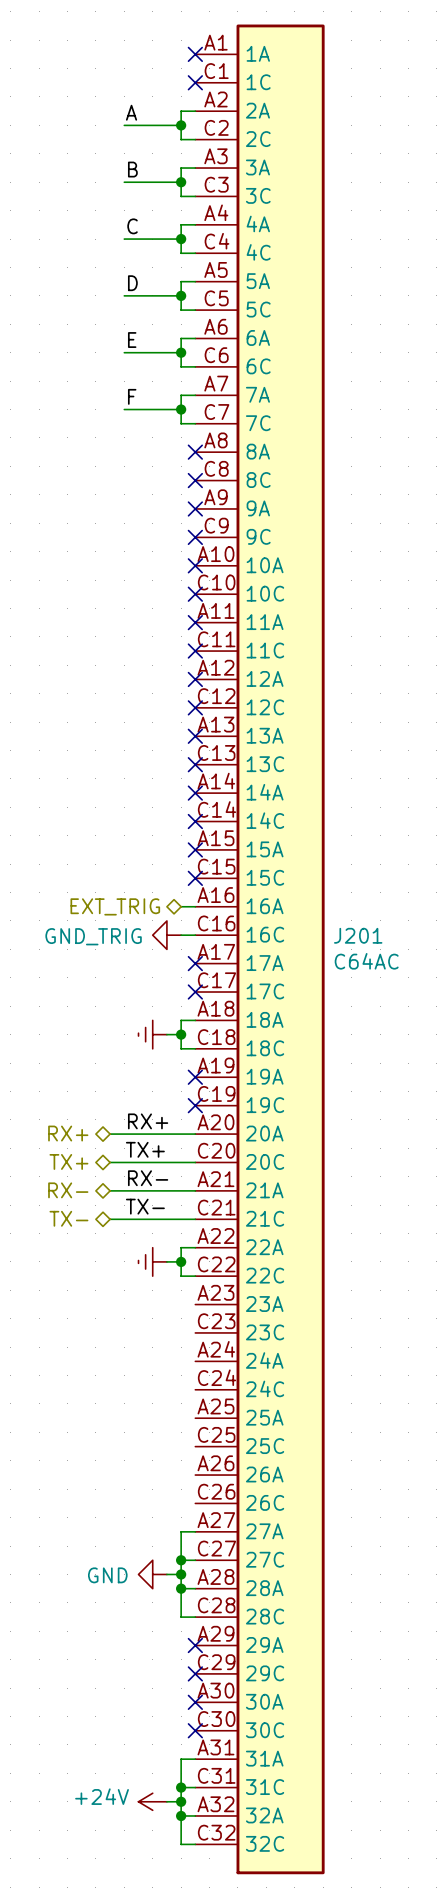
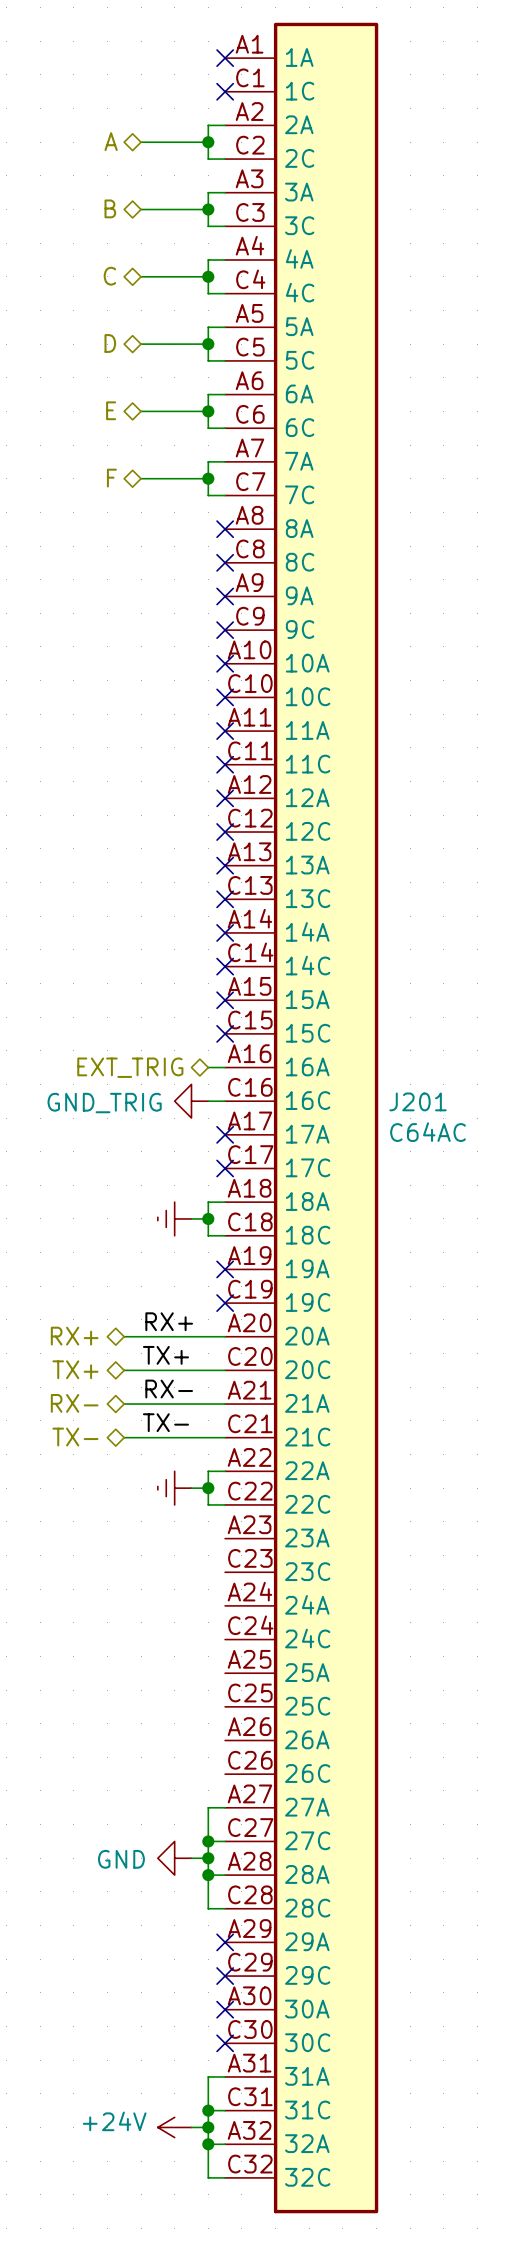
label: A (131, 112) -> none
hierarchical label: none -> A (111, 141)
label: B (132, 169) -> none
hierarchical label: none -> B (110, 208)
label: C (132, 226) -> none
hierarchical label: none -> C (109, 276)
label: D (132, 283) -> none
hierarchical label: none -> D (110, 343)
label: E (132, 340) -> none
hierarchical label: none -> E (111, 410)
label: F (132, 396) -> none
hierarchical label: none -> F (111, 478)

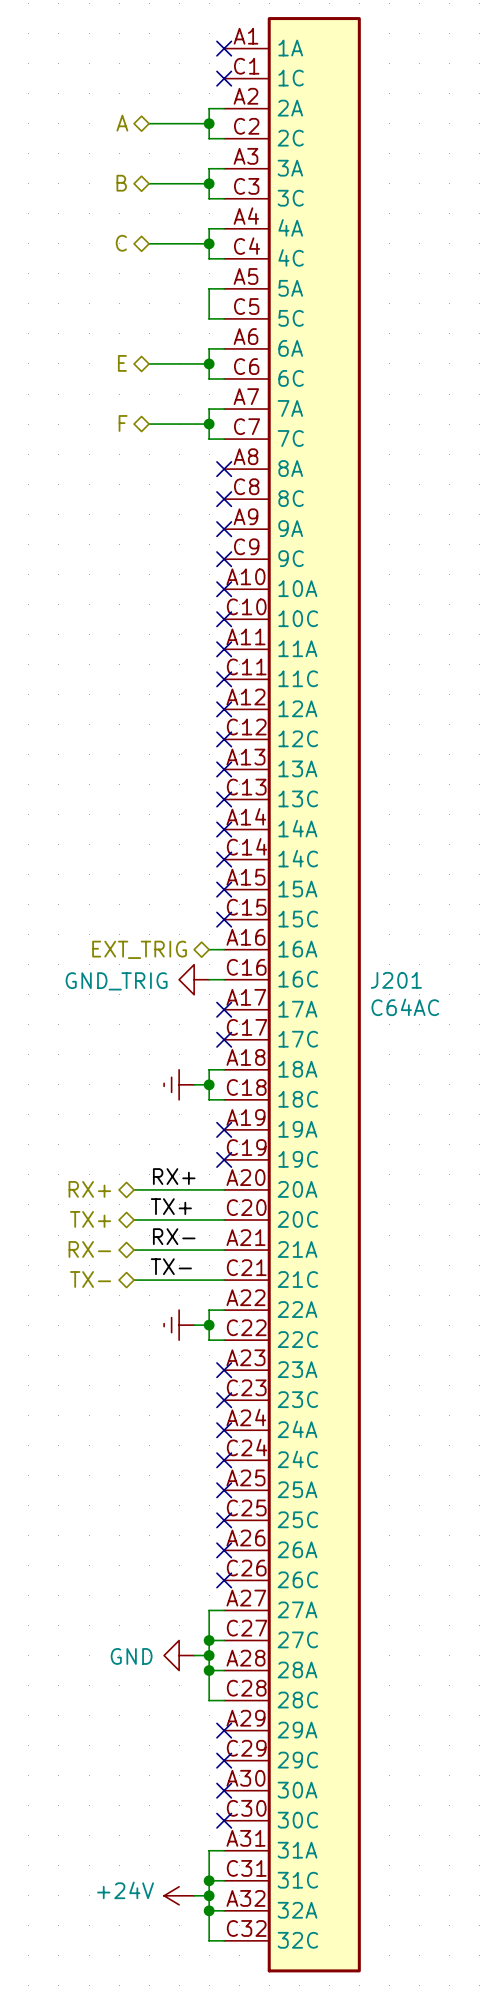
hierarchical label: D (110, 343) -> none
wire: (141, 344) (208, 344) -> none
junction: (208, 344) -> none
no-connect mark: none -> (224, 1370)
no-connect mark: none -> (224, 1400)
no-connect mark: none -> (224, 1430)
no-connect mark: none -> (224, 1460)
no-connect mark: none -> (224, 1490)
no-connect mark: none -> (224, 1520)
no-connect mark: none -> (224, 1550)
no-connect mark: none -> (224, 1580)

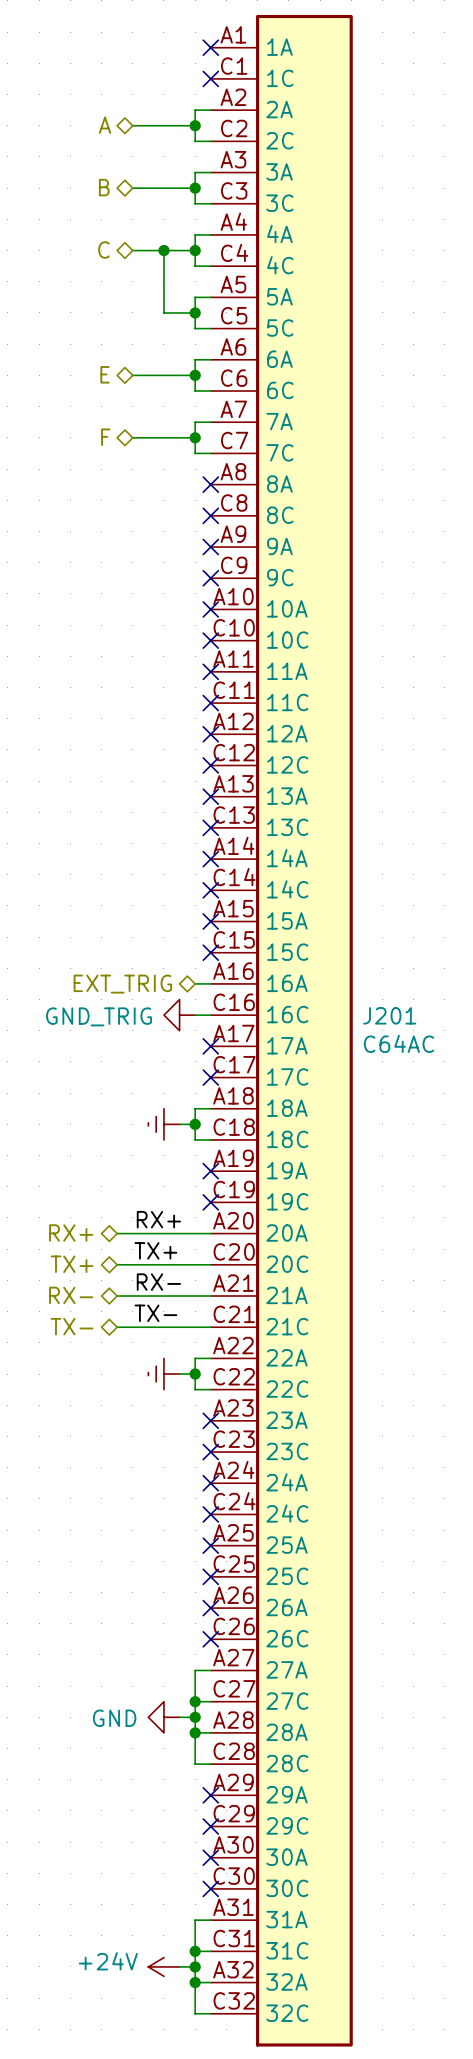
wire: none -> (163, 250) (163, 312) (195, 312)
junction: none -> (163, 250)
junction: none -> (195, 312)

